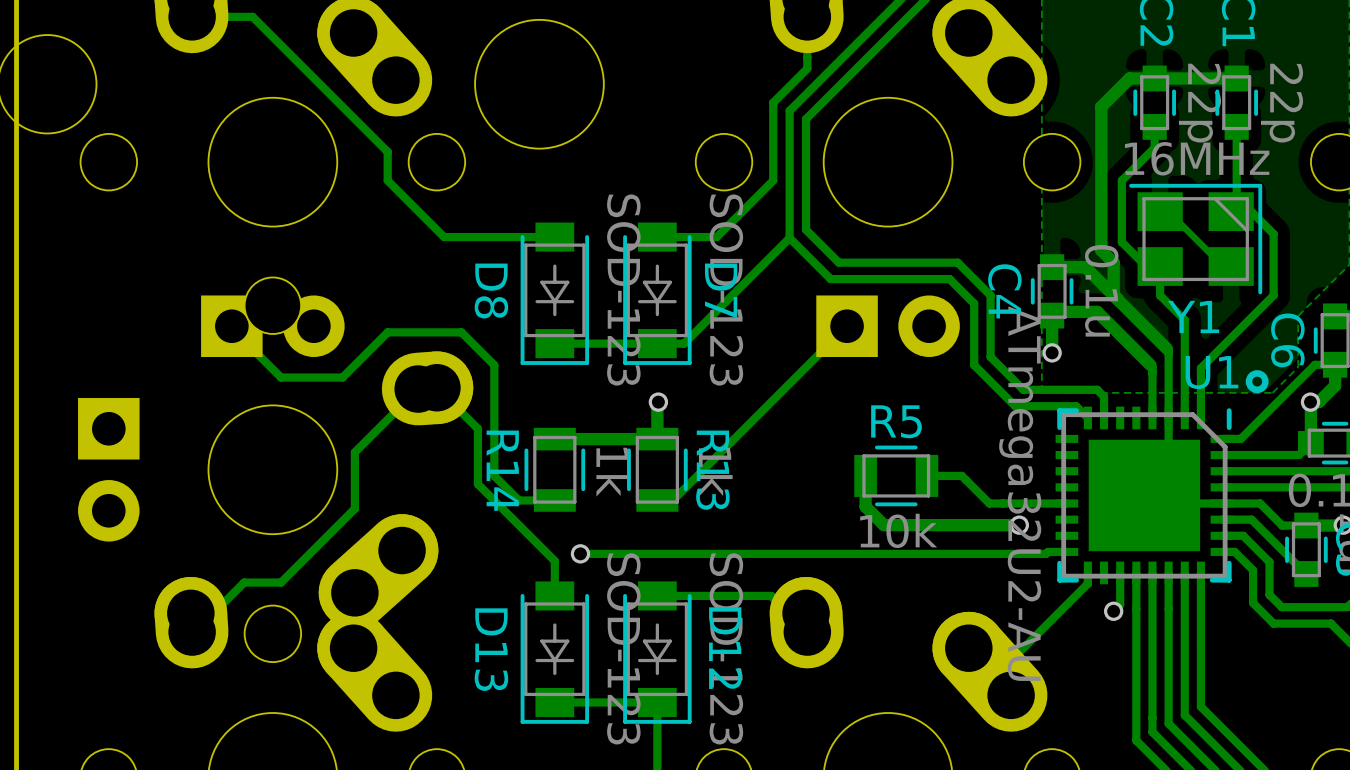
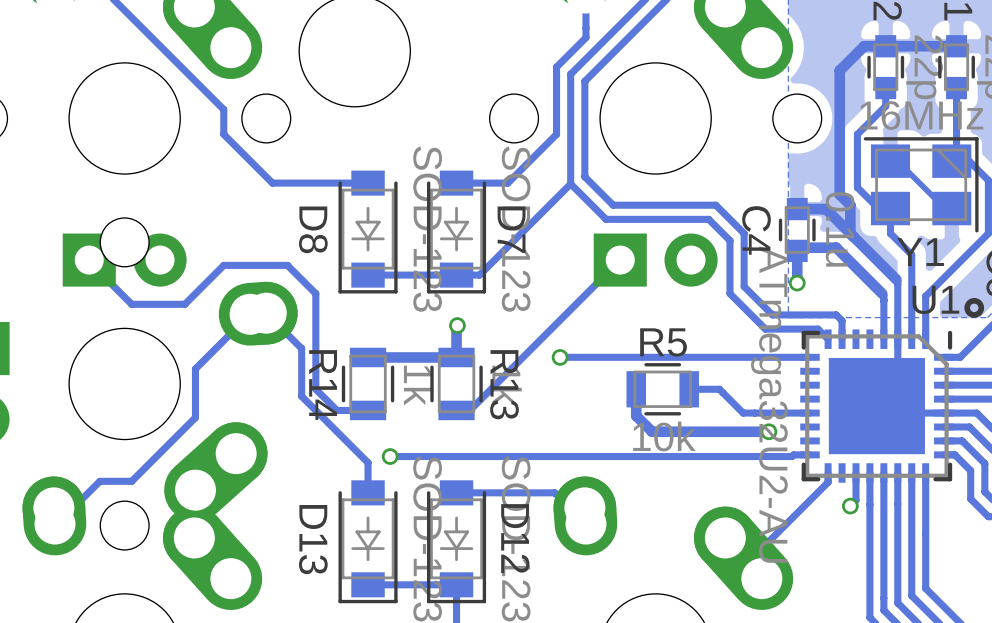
track: none -> (810, 357) (560, 357)
via: none -> (560, 357)

